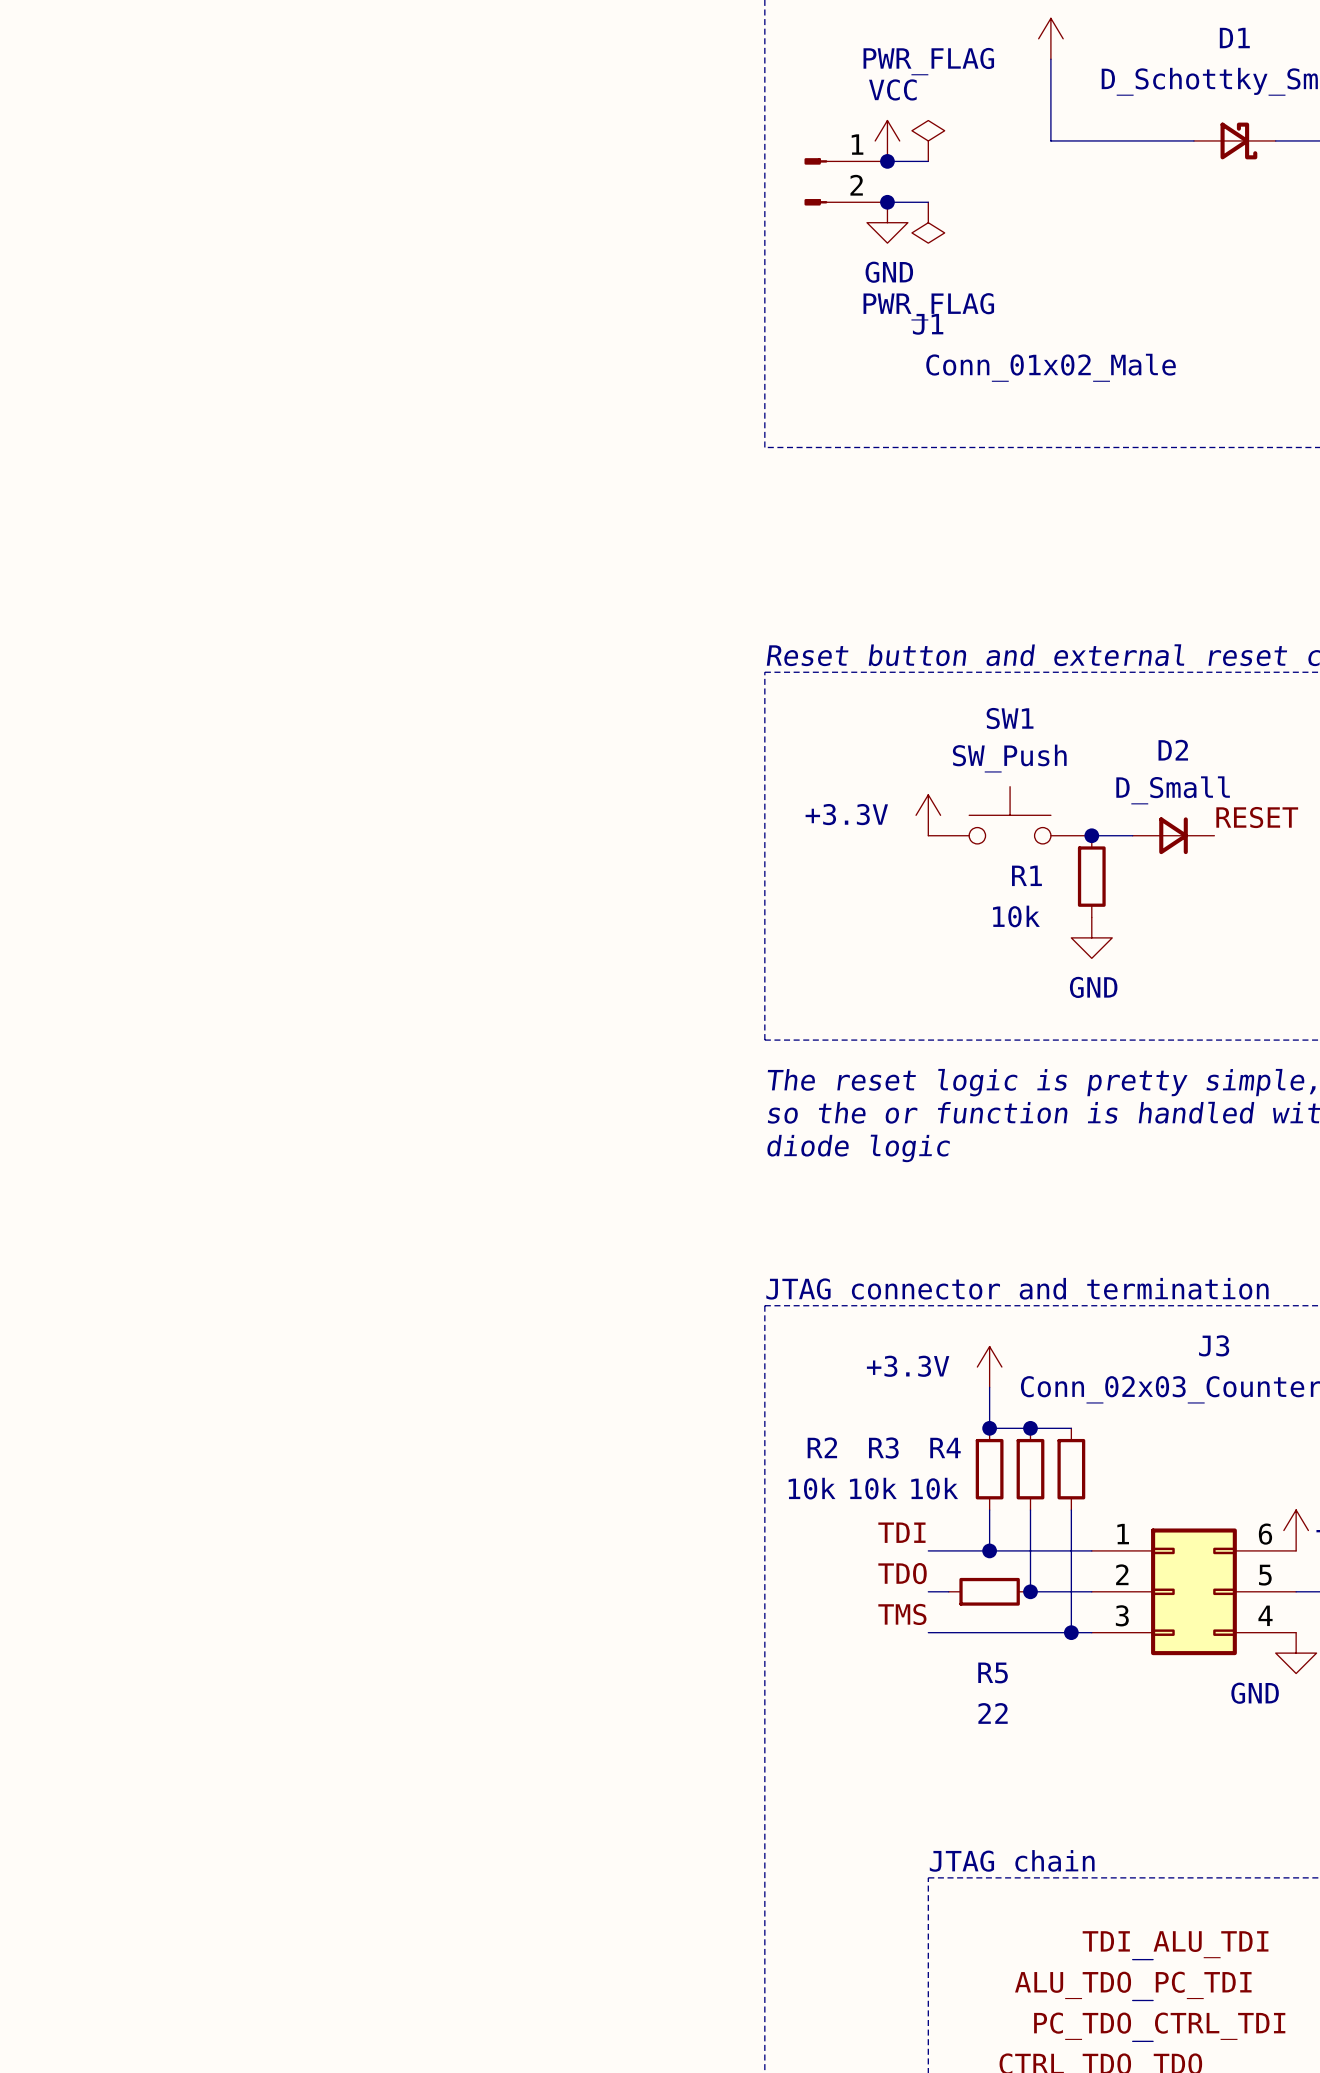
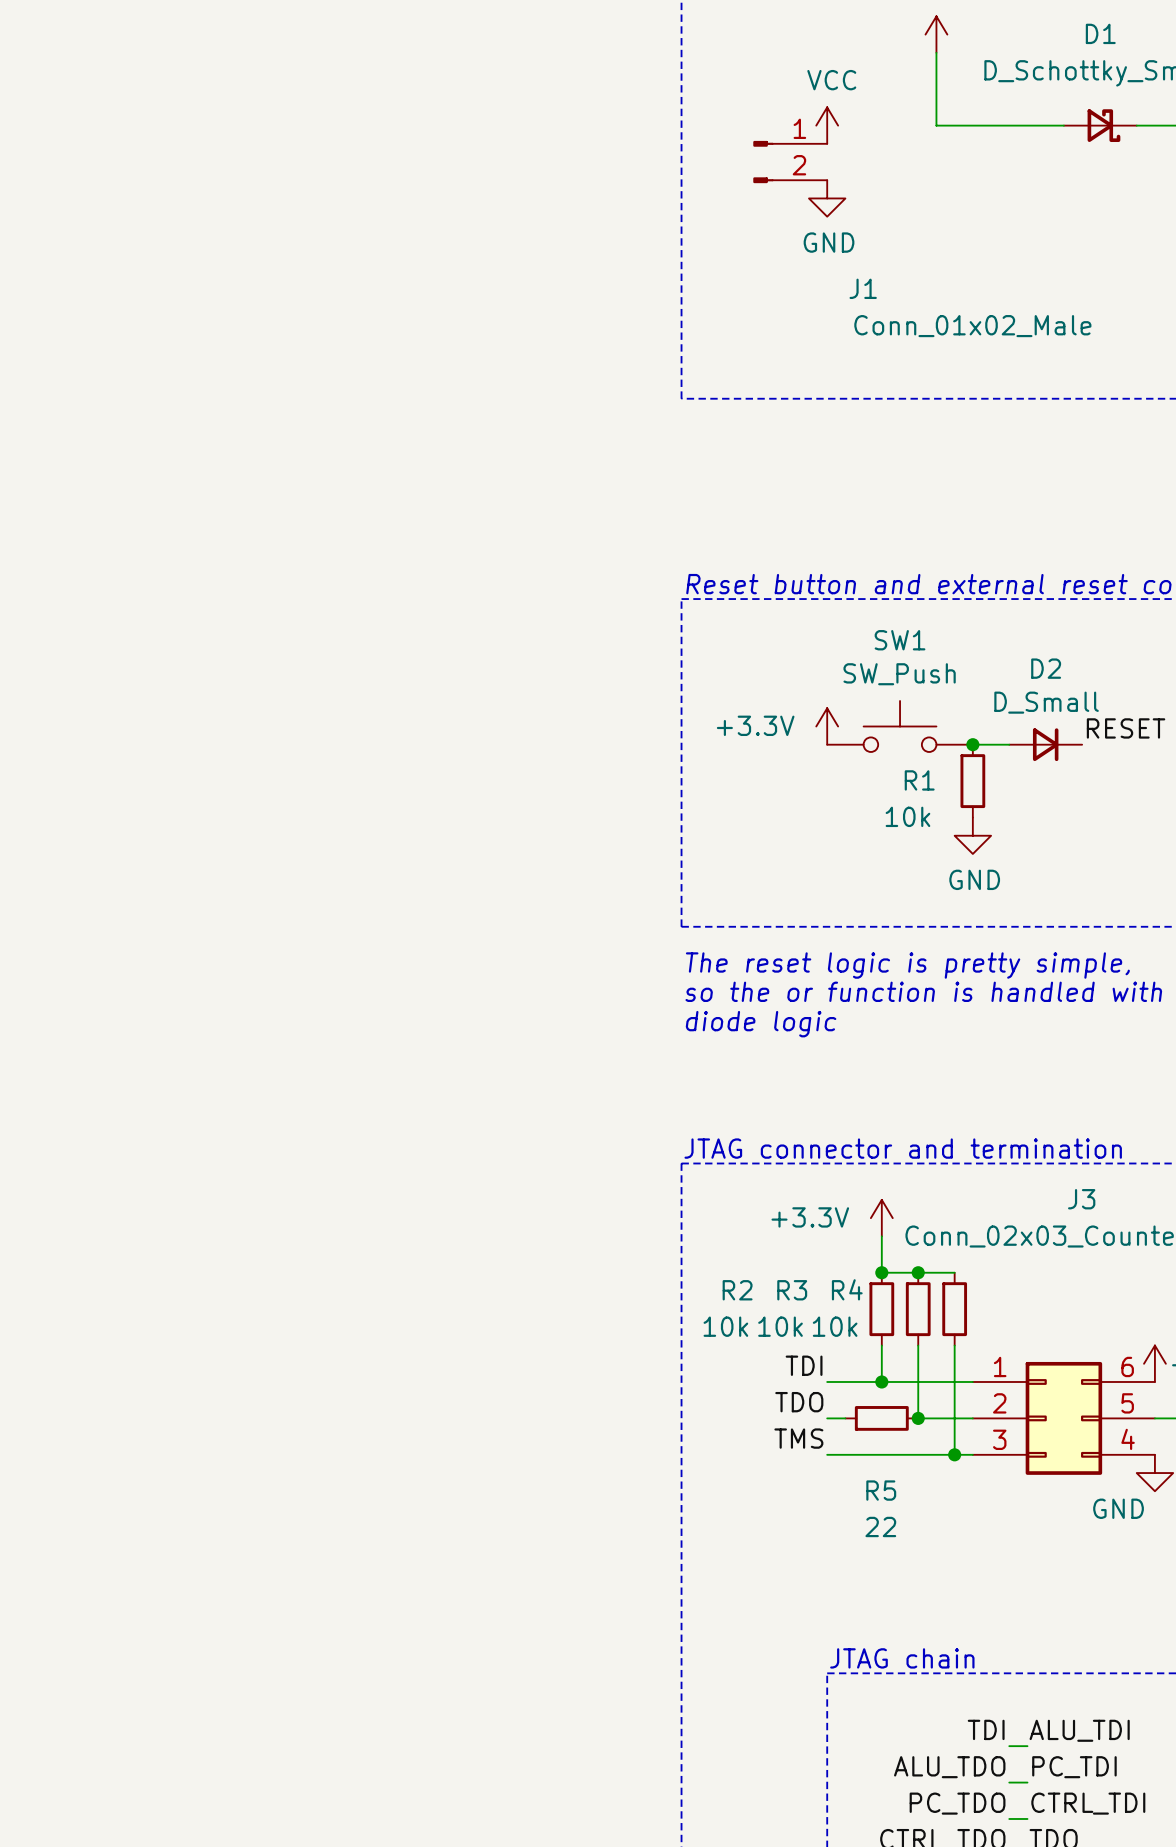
power symbol: VCC (887, 140) -> none
power symbol: PWR_FLAG (928, 140) -> VCC (827, 125)
junction: (887, 161) -> none
J1 position: (845, 181) -> (790, 162)
junction: (887, 202) -> none
power symbol: GND (887, 222) -> none
power symbol: PWR_FLAG (928, 222) -> GND (827, 198)

